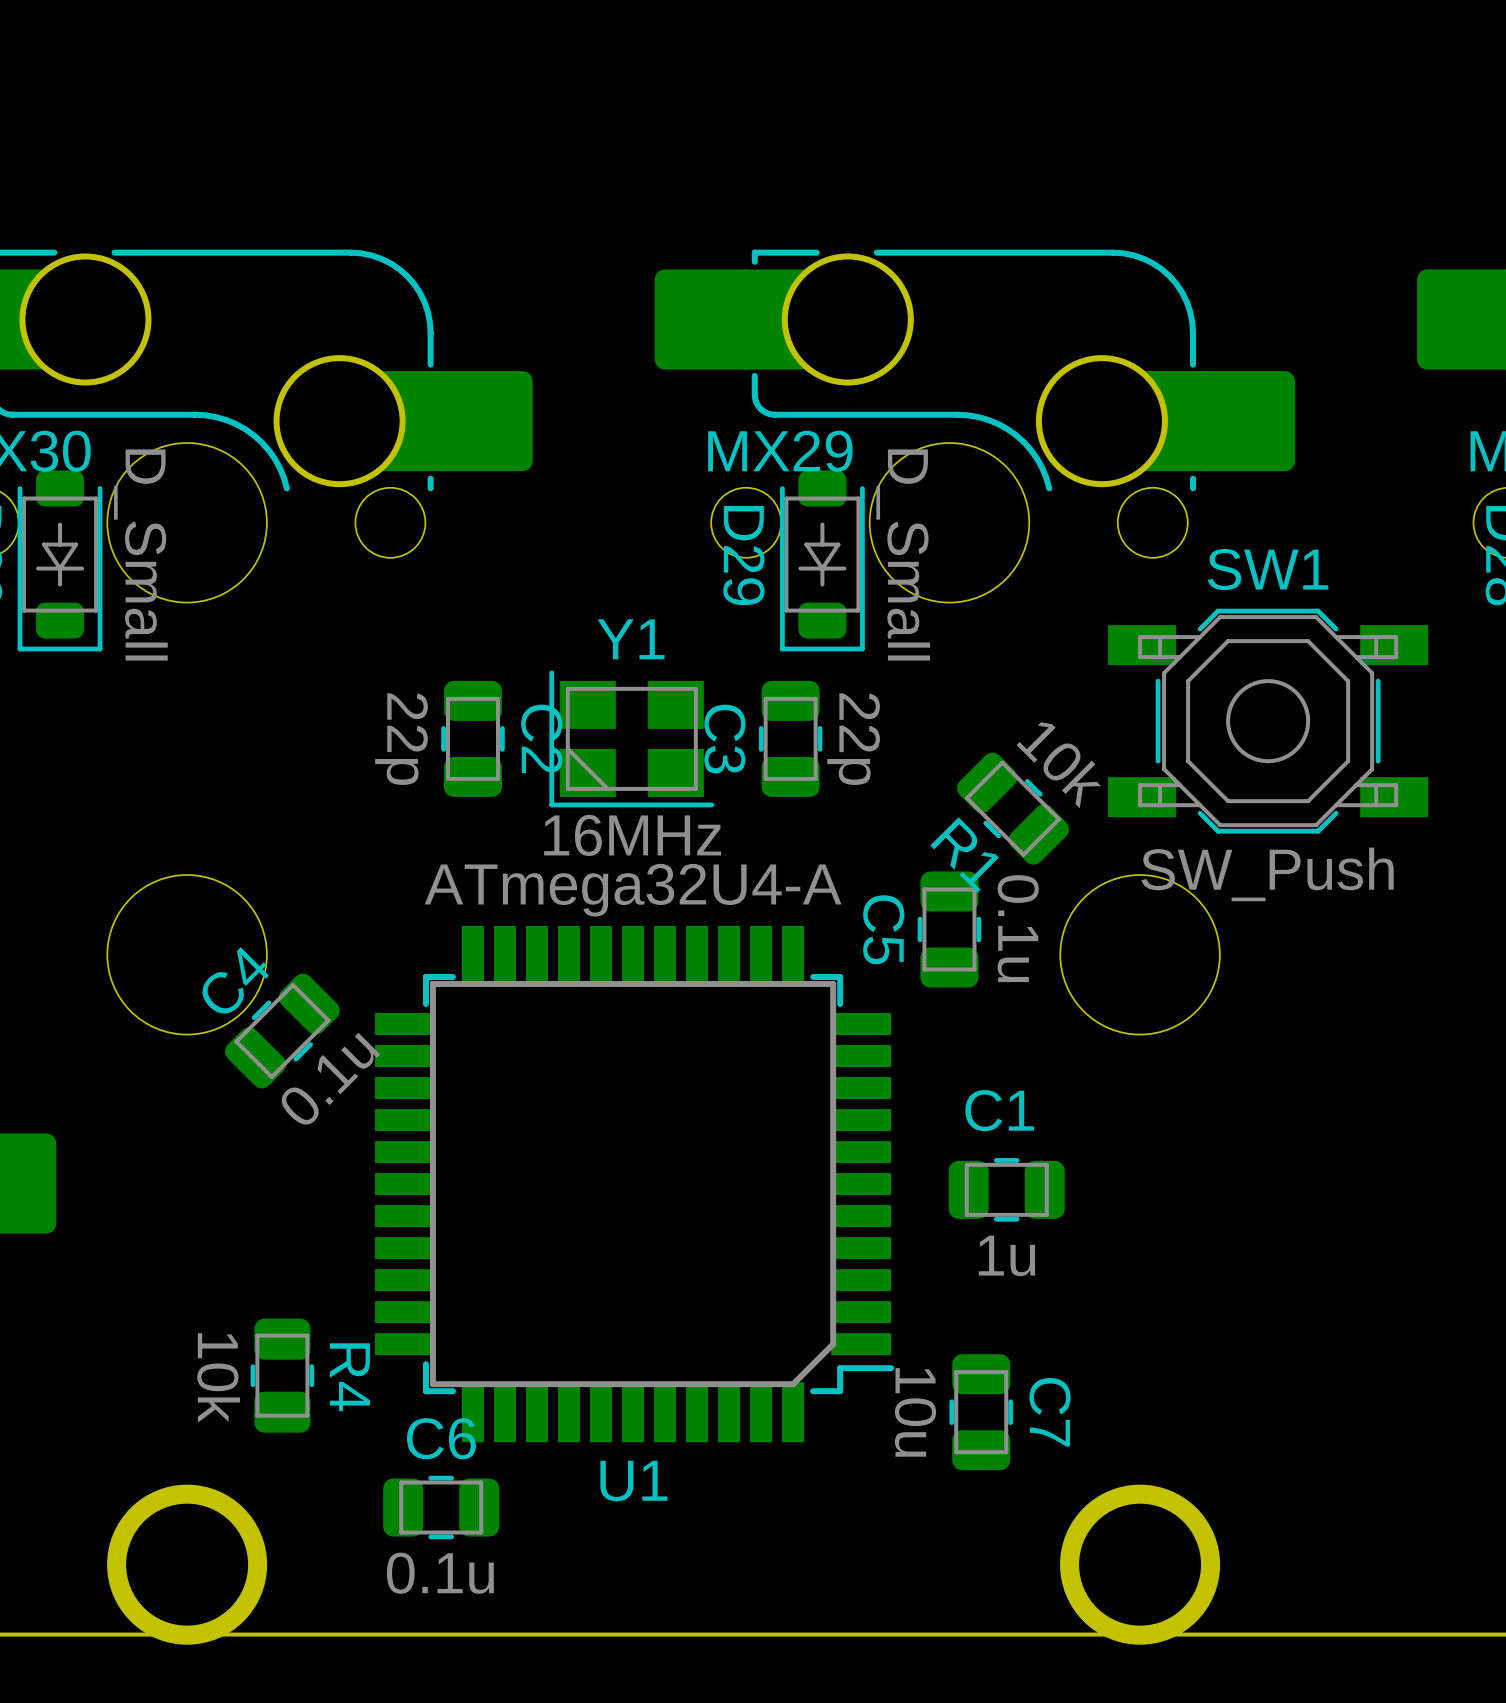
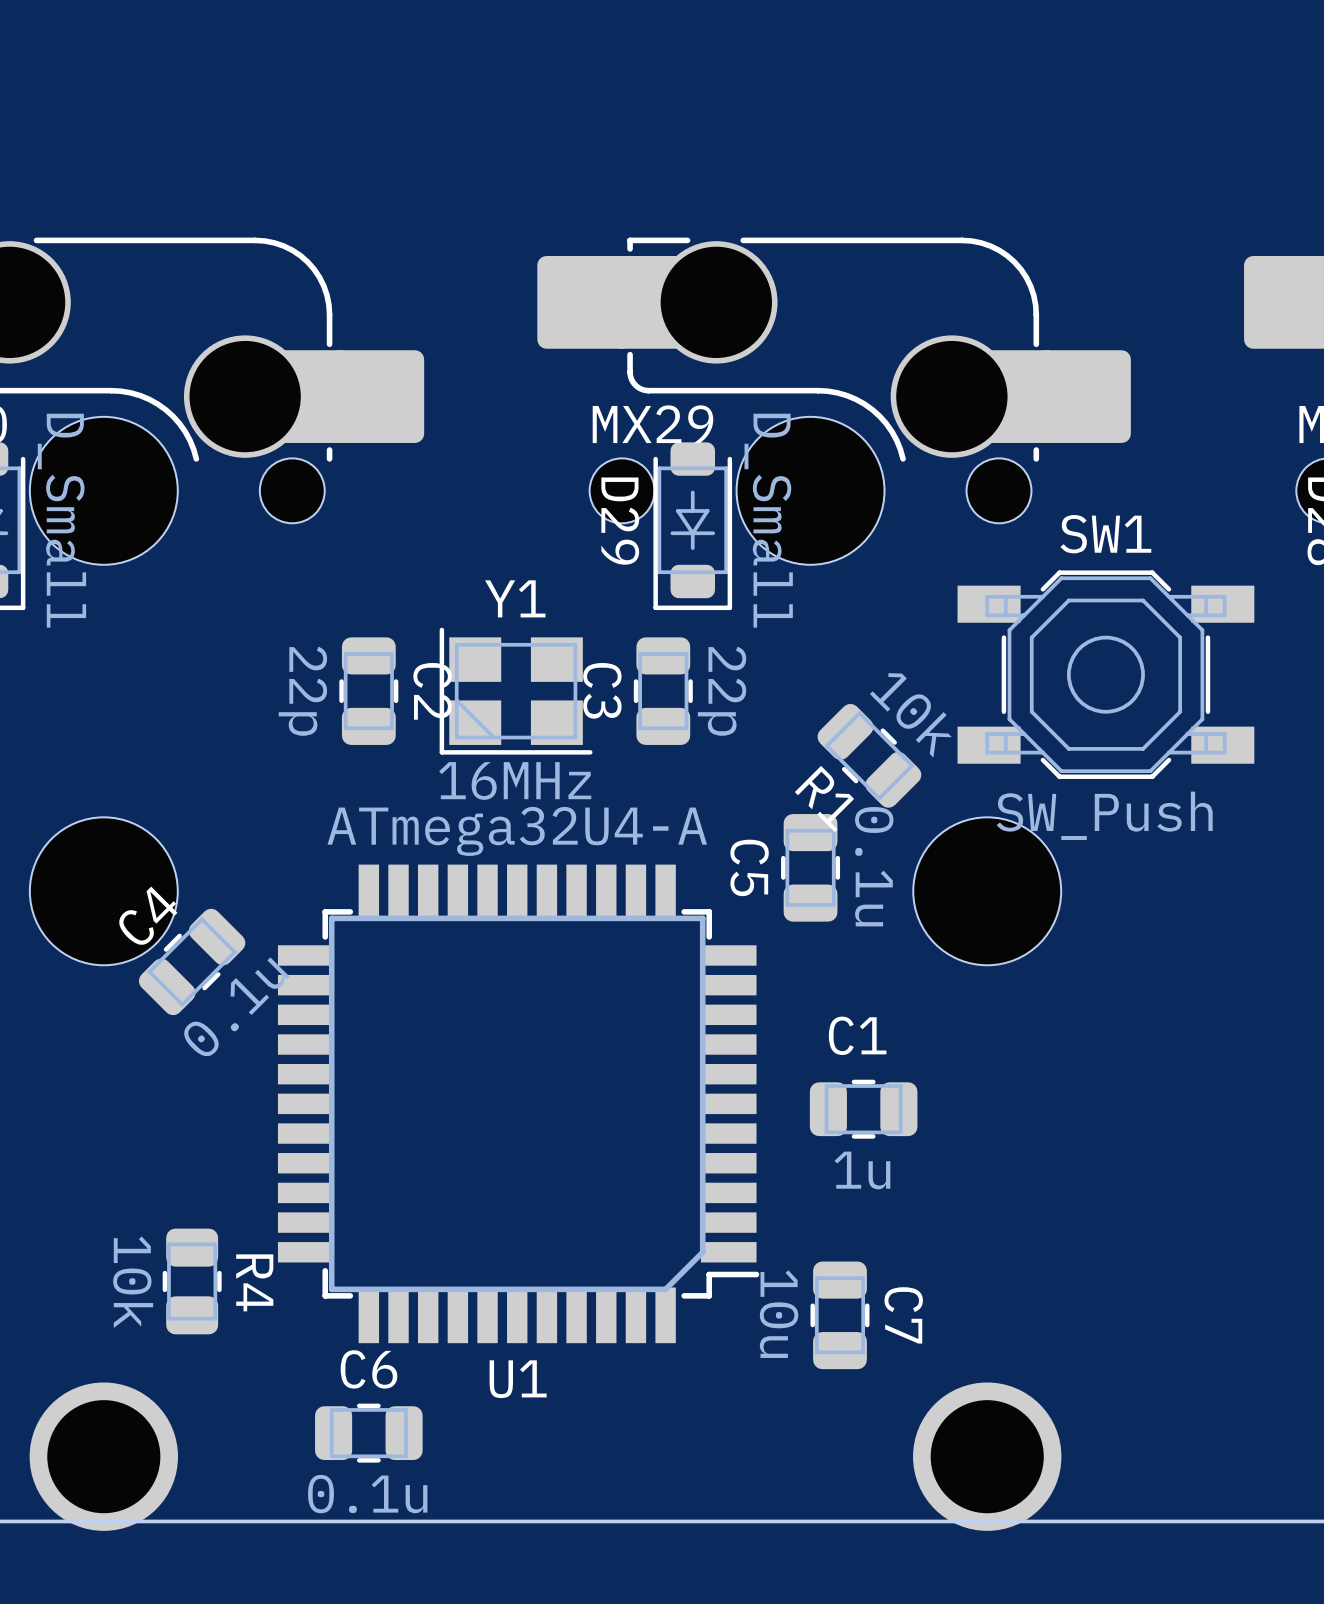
C6 position: (441, 1507) -> (368, 1433)

